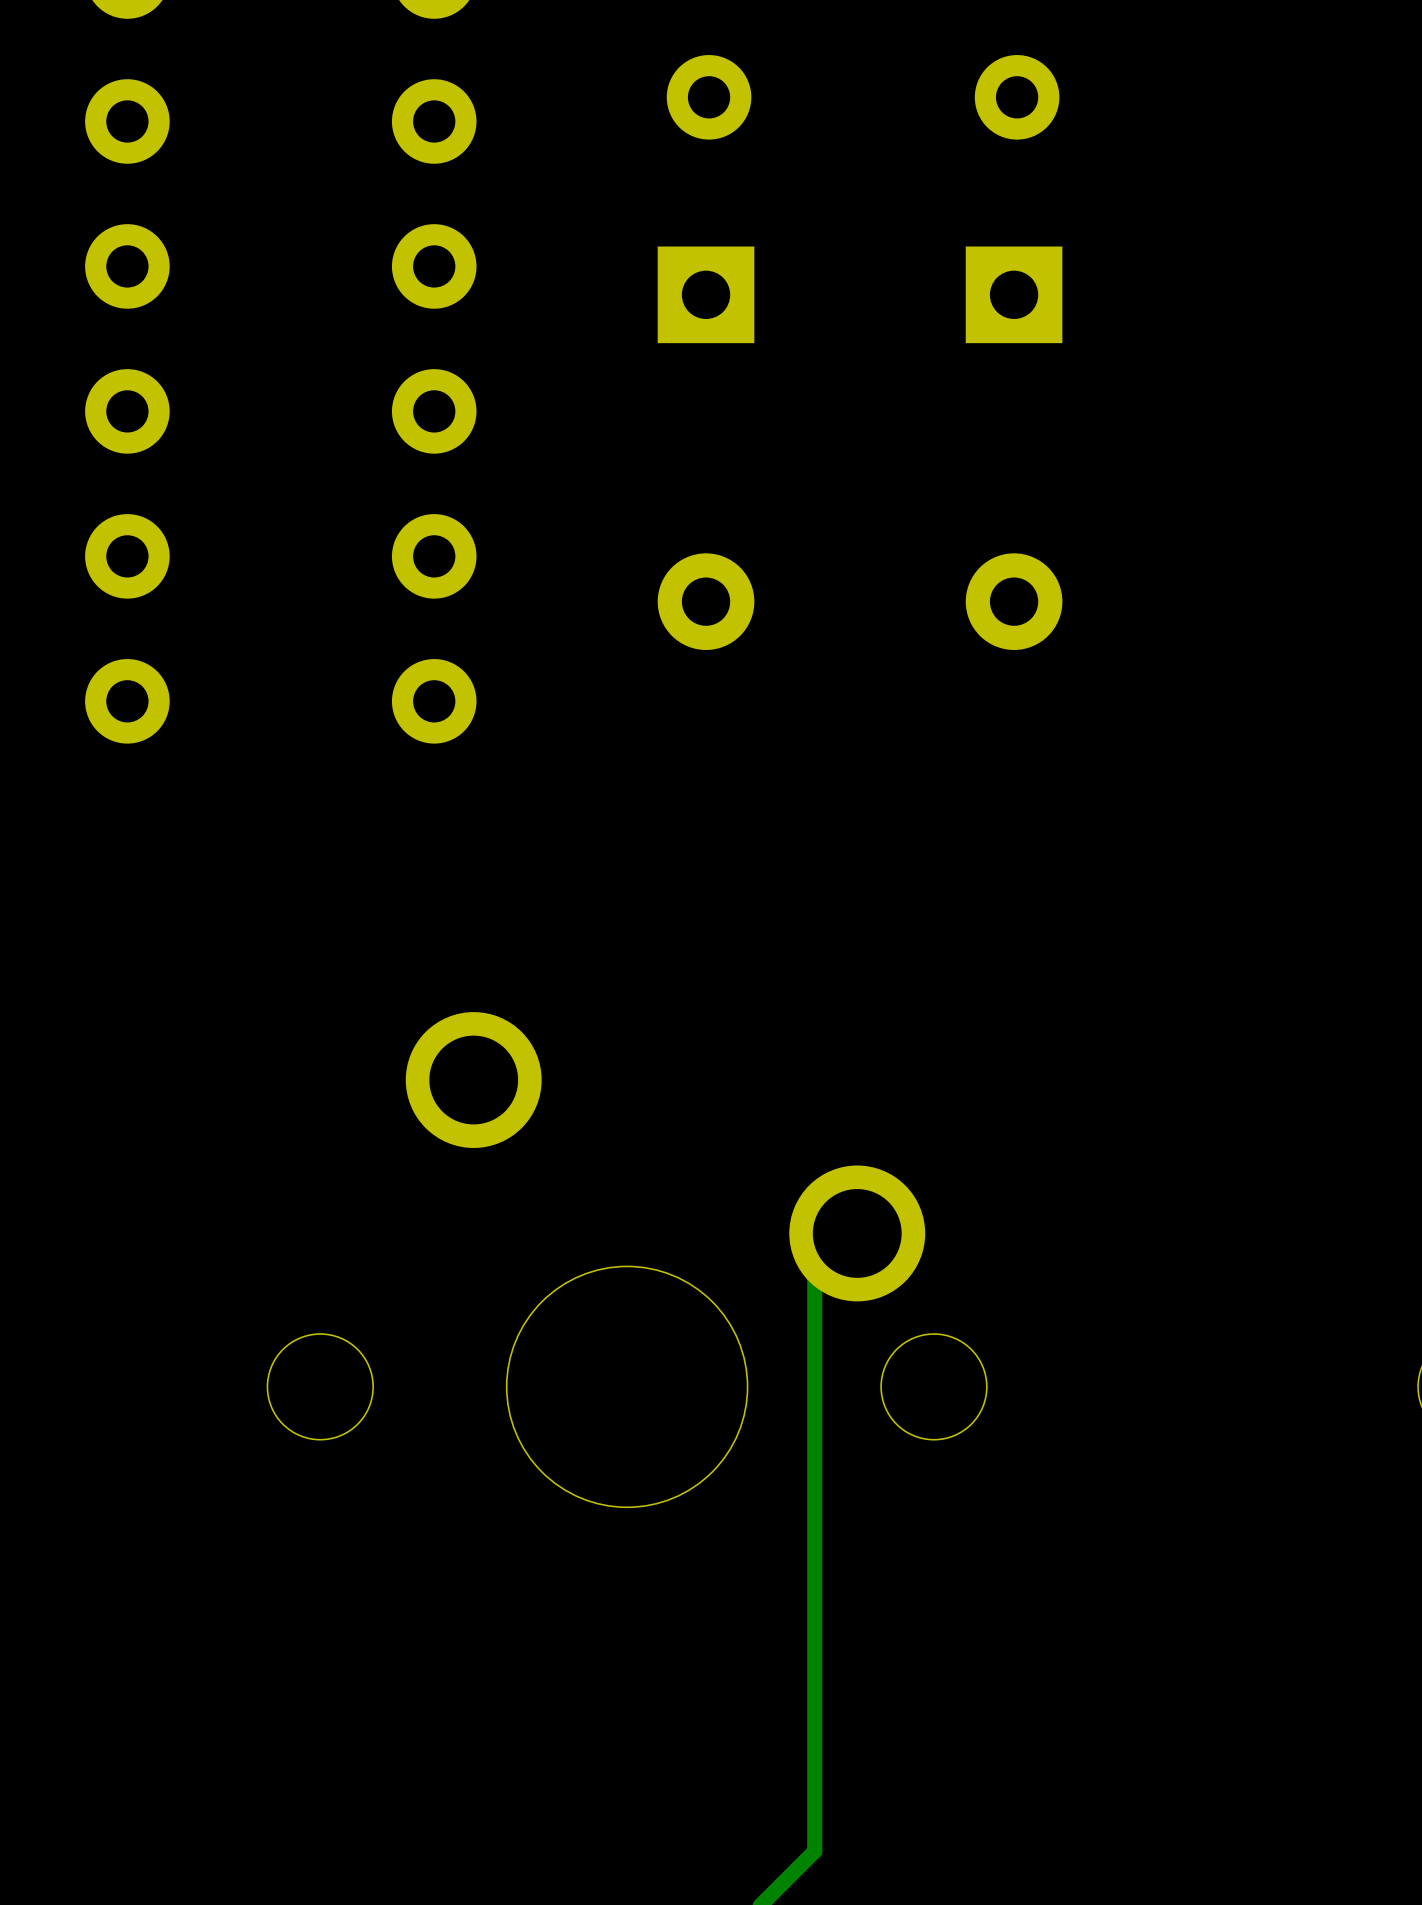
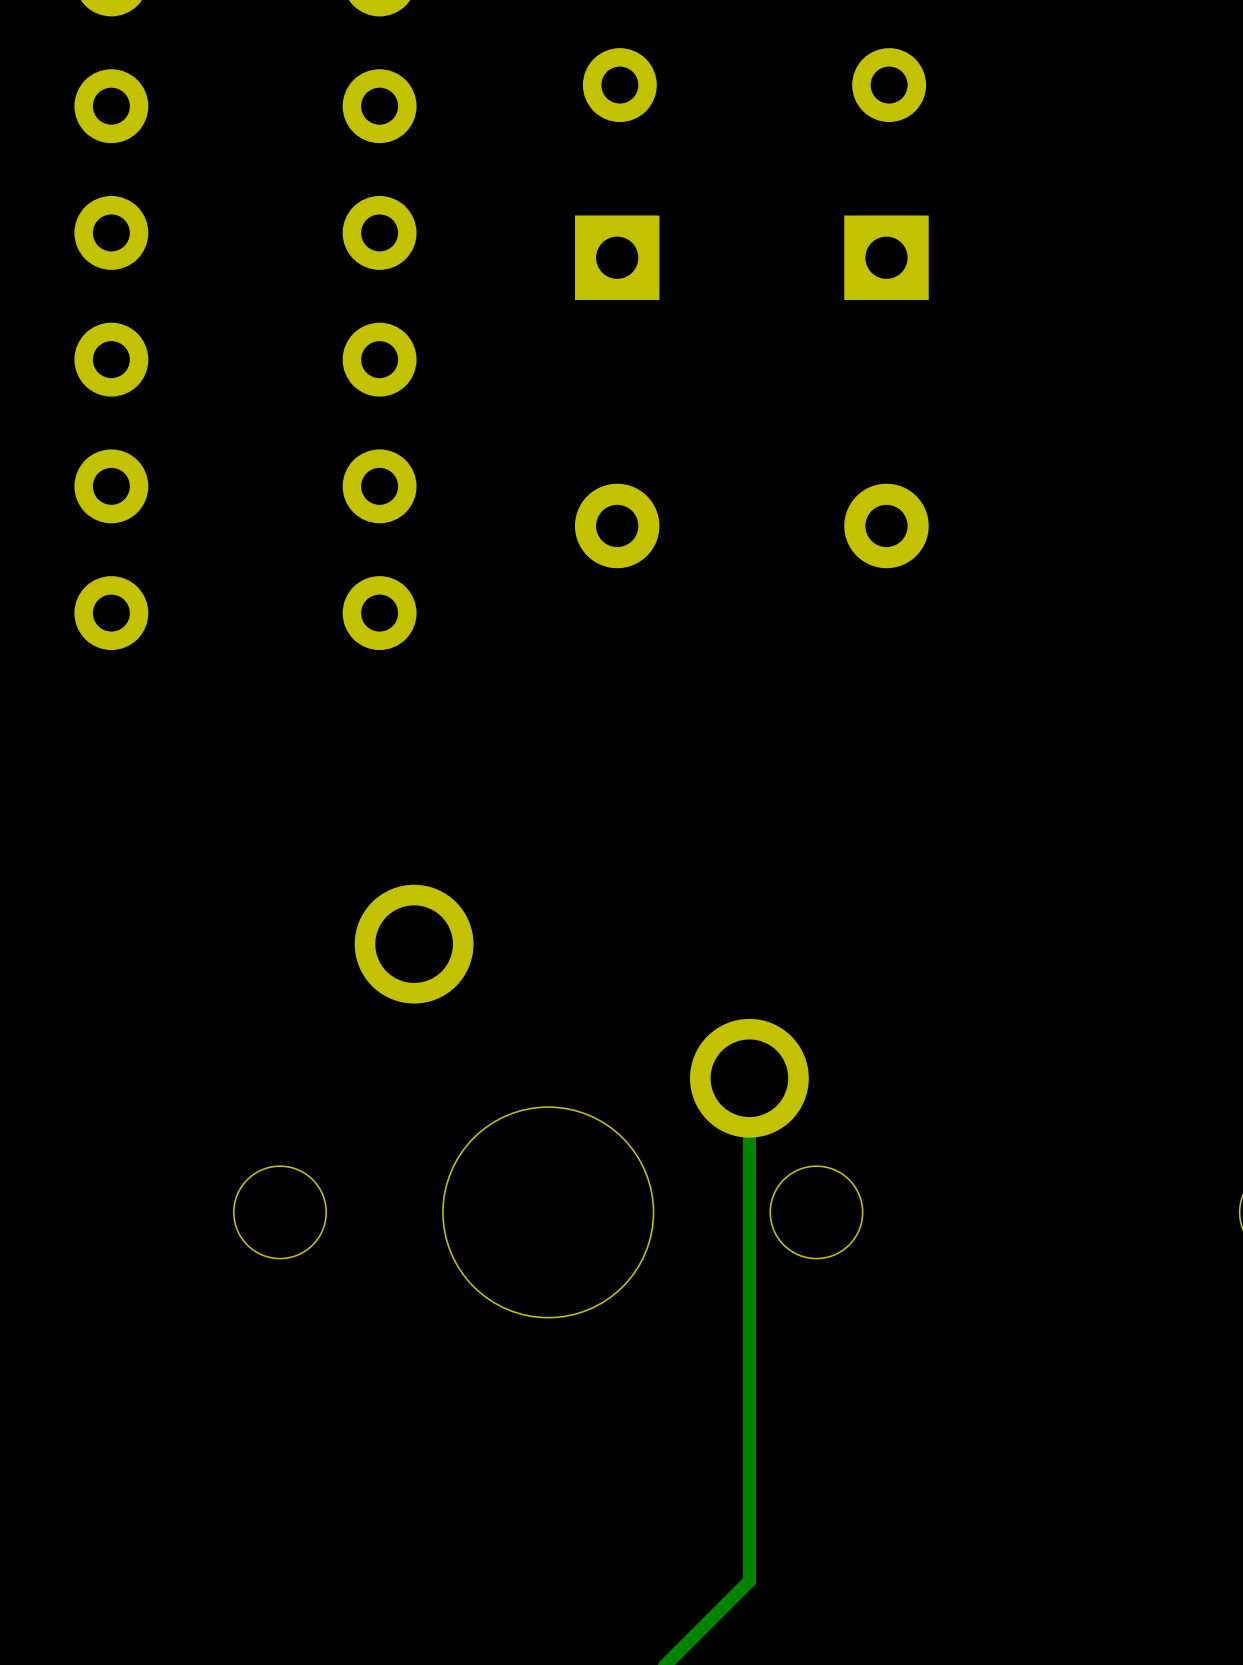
track: (857, 1233) (814, 1275) (814, 1851) -> (749, 1078) (749, 1581) (712, 1618)

